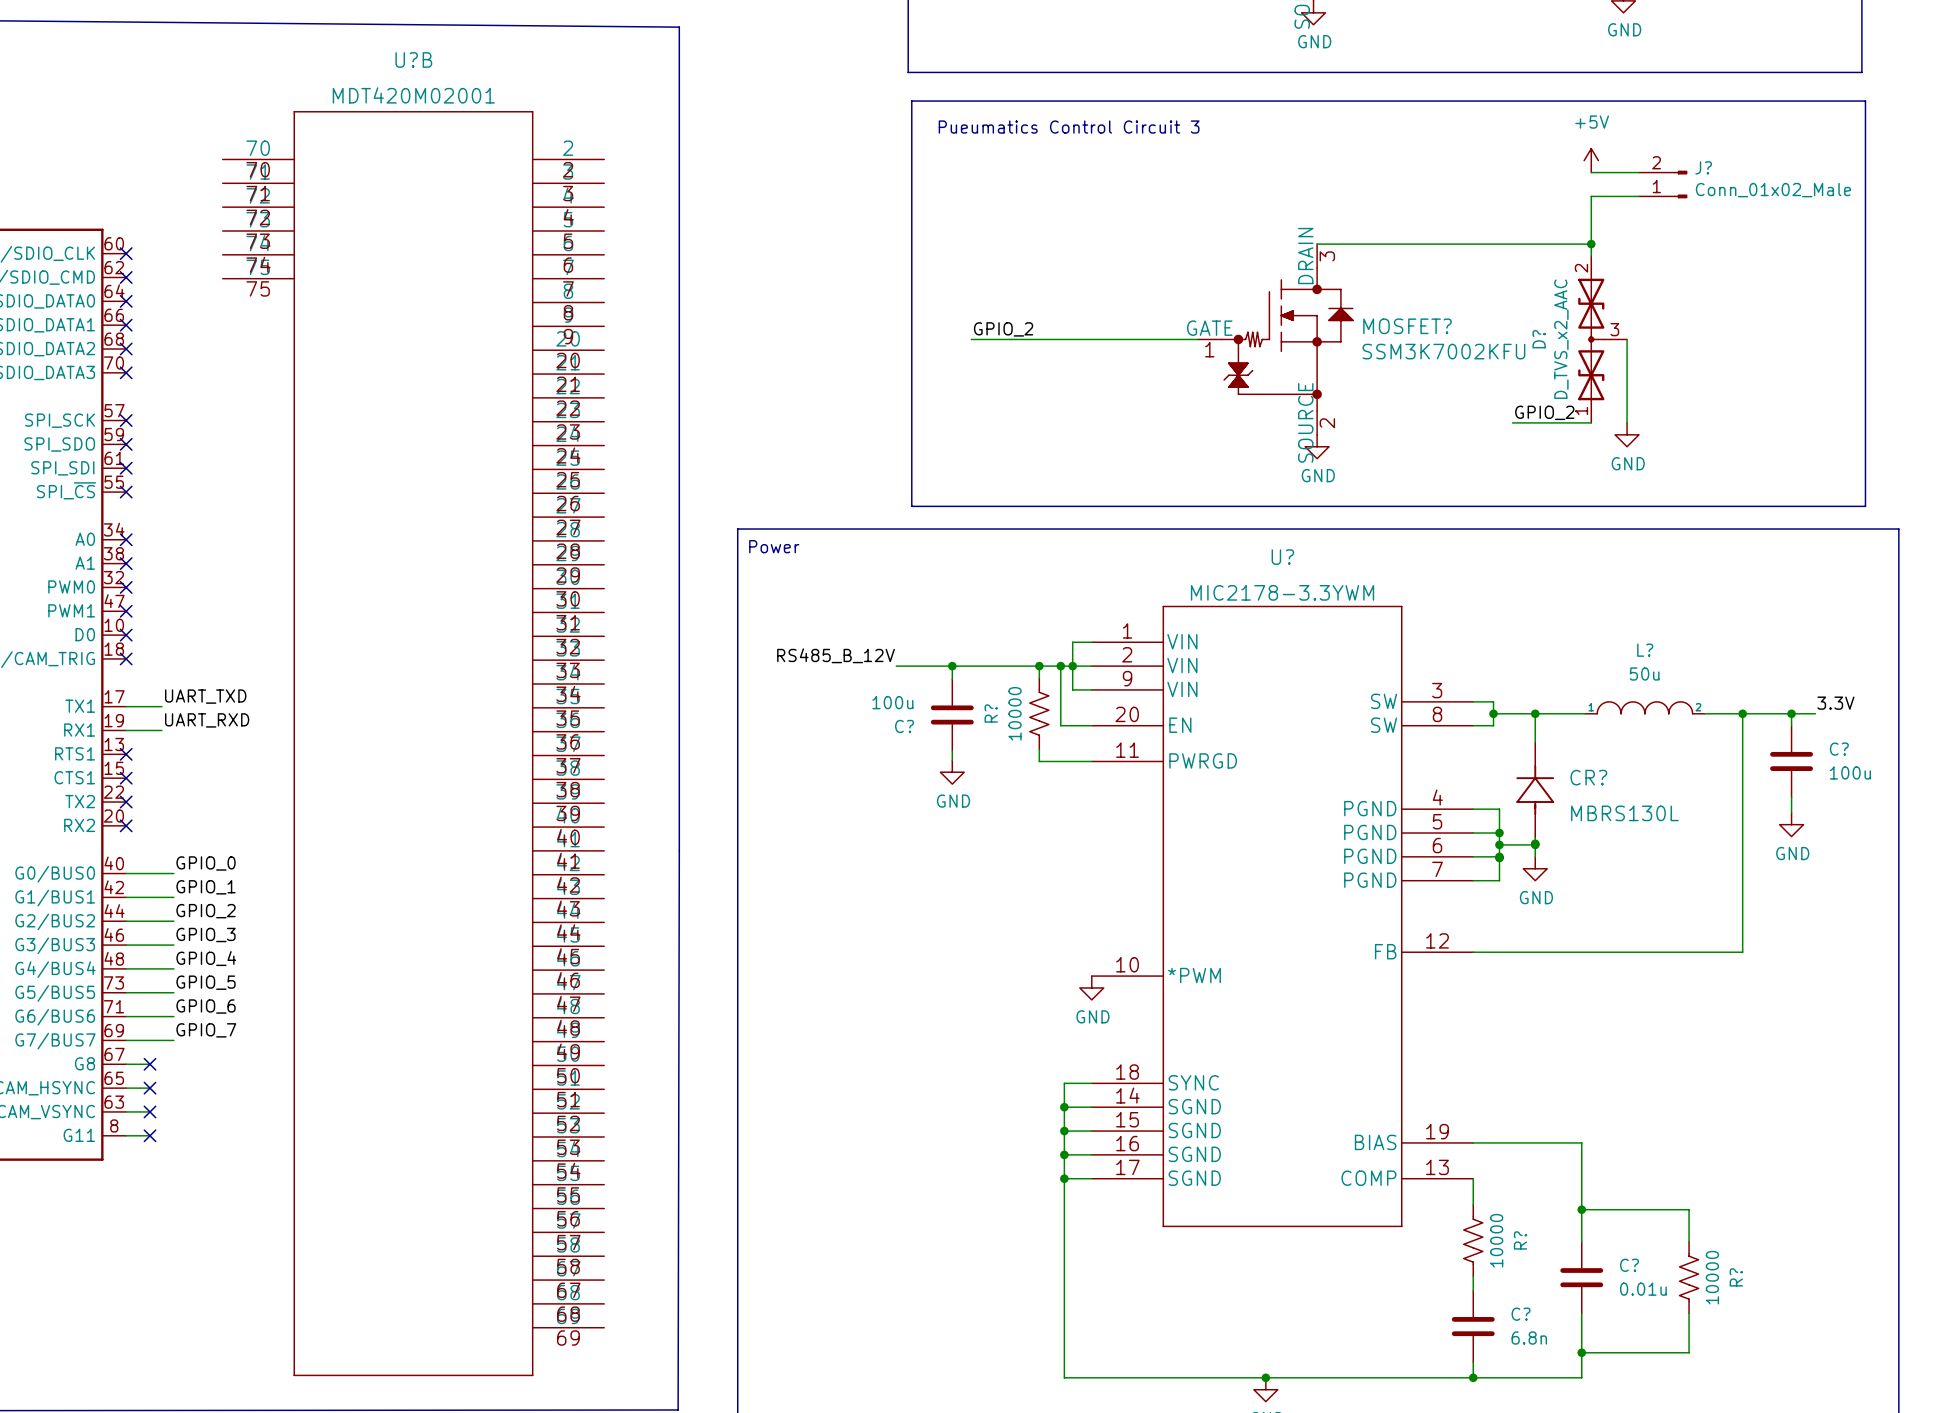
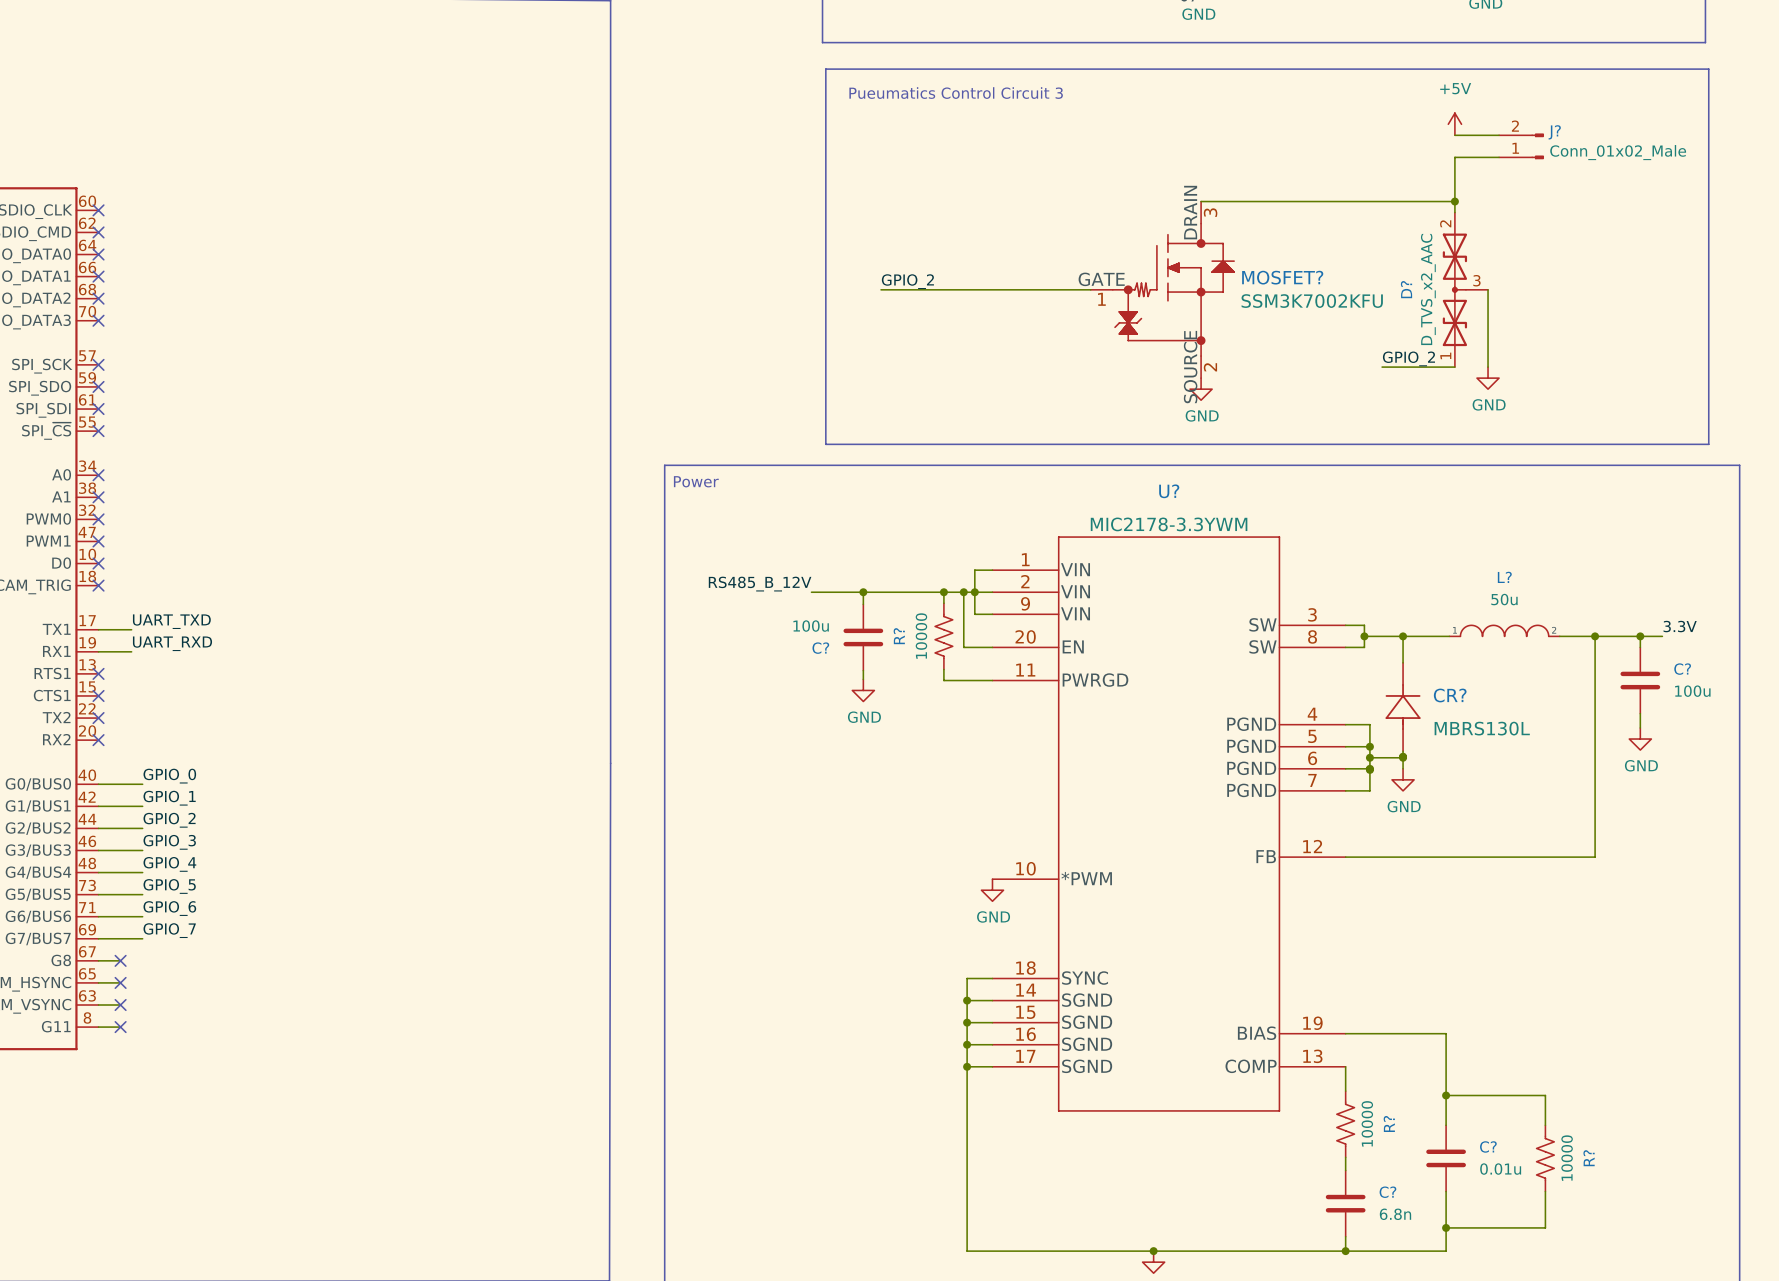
U?B: MDT420M02001 (413, 743) -> none

